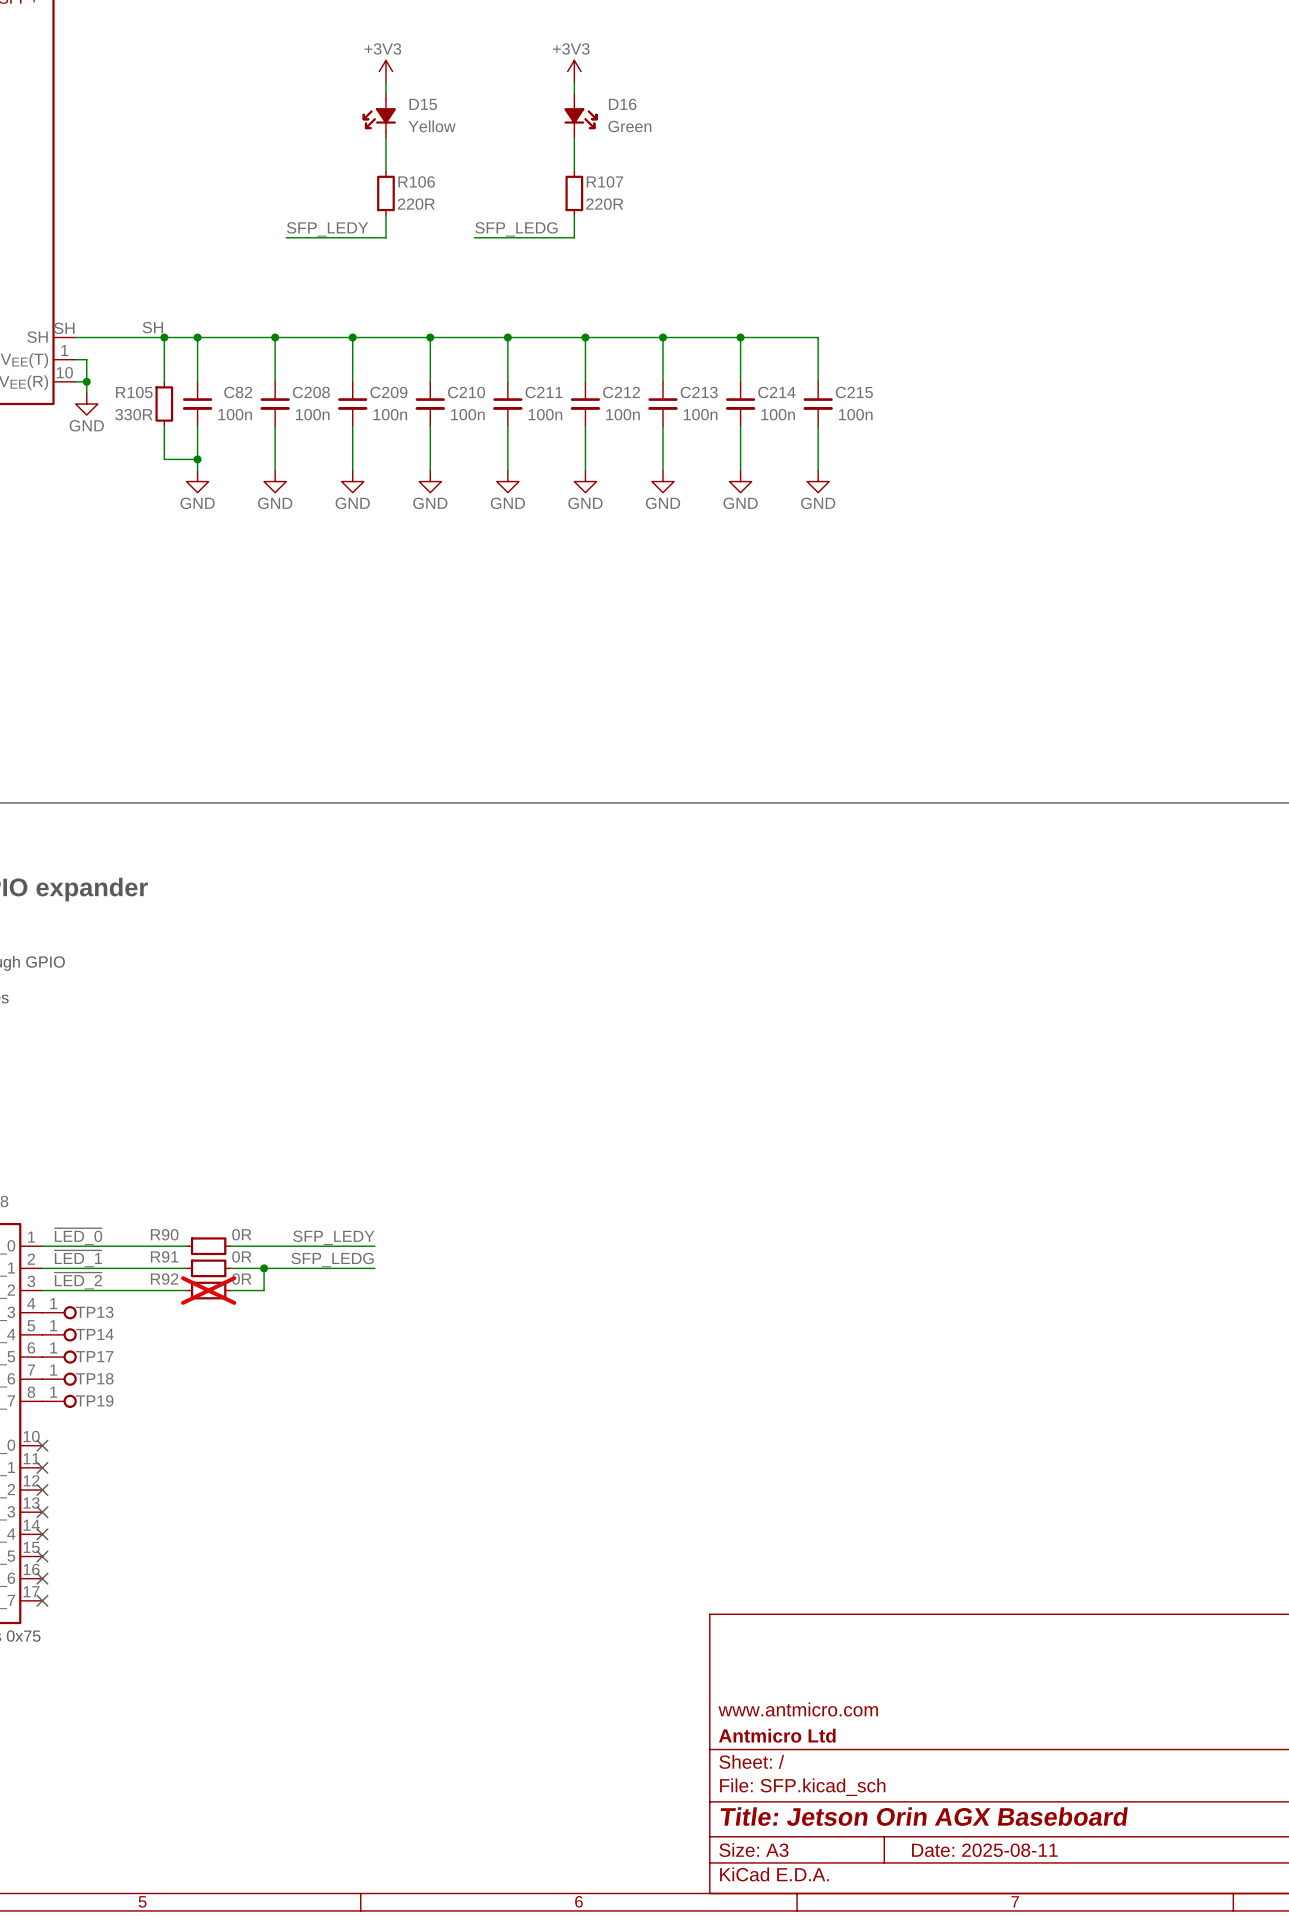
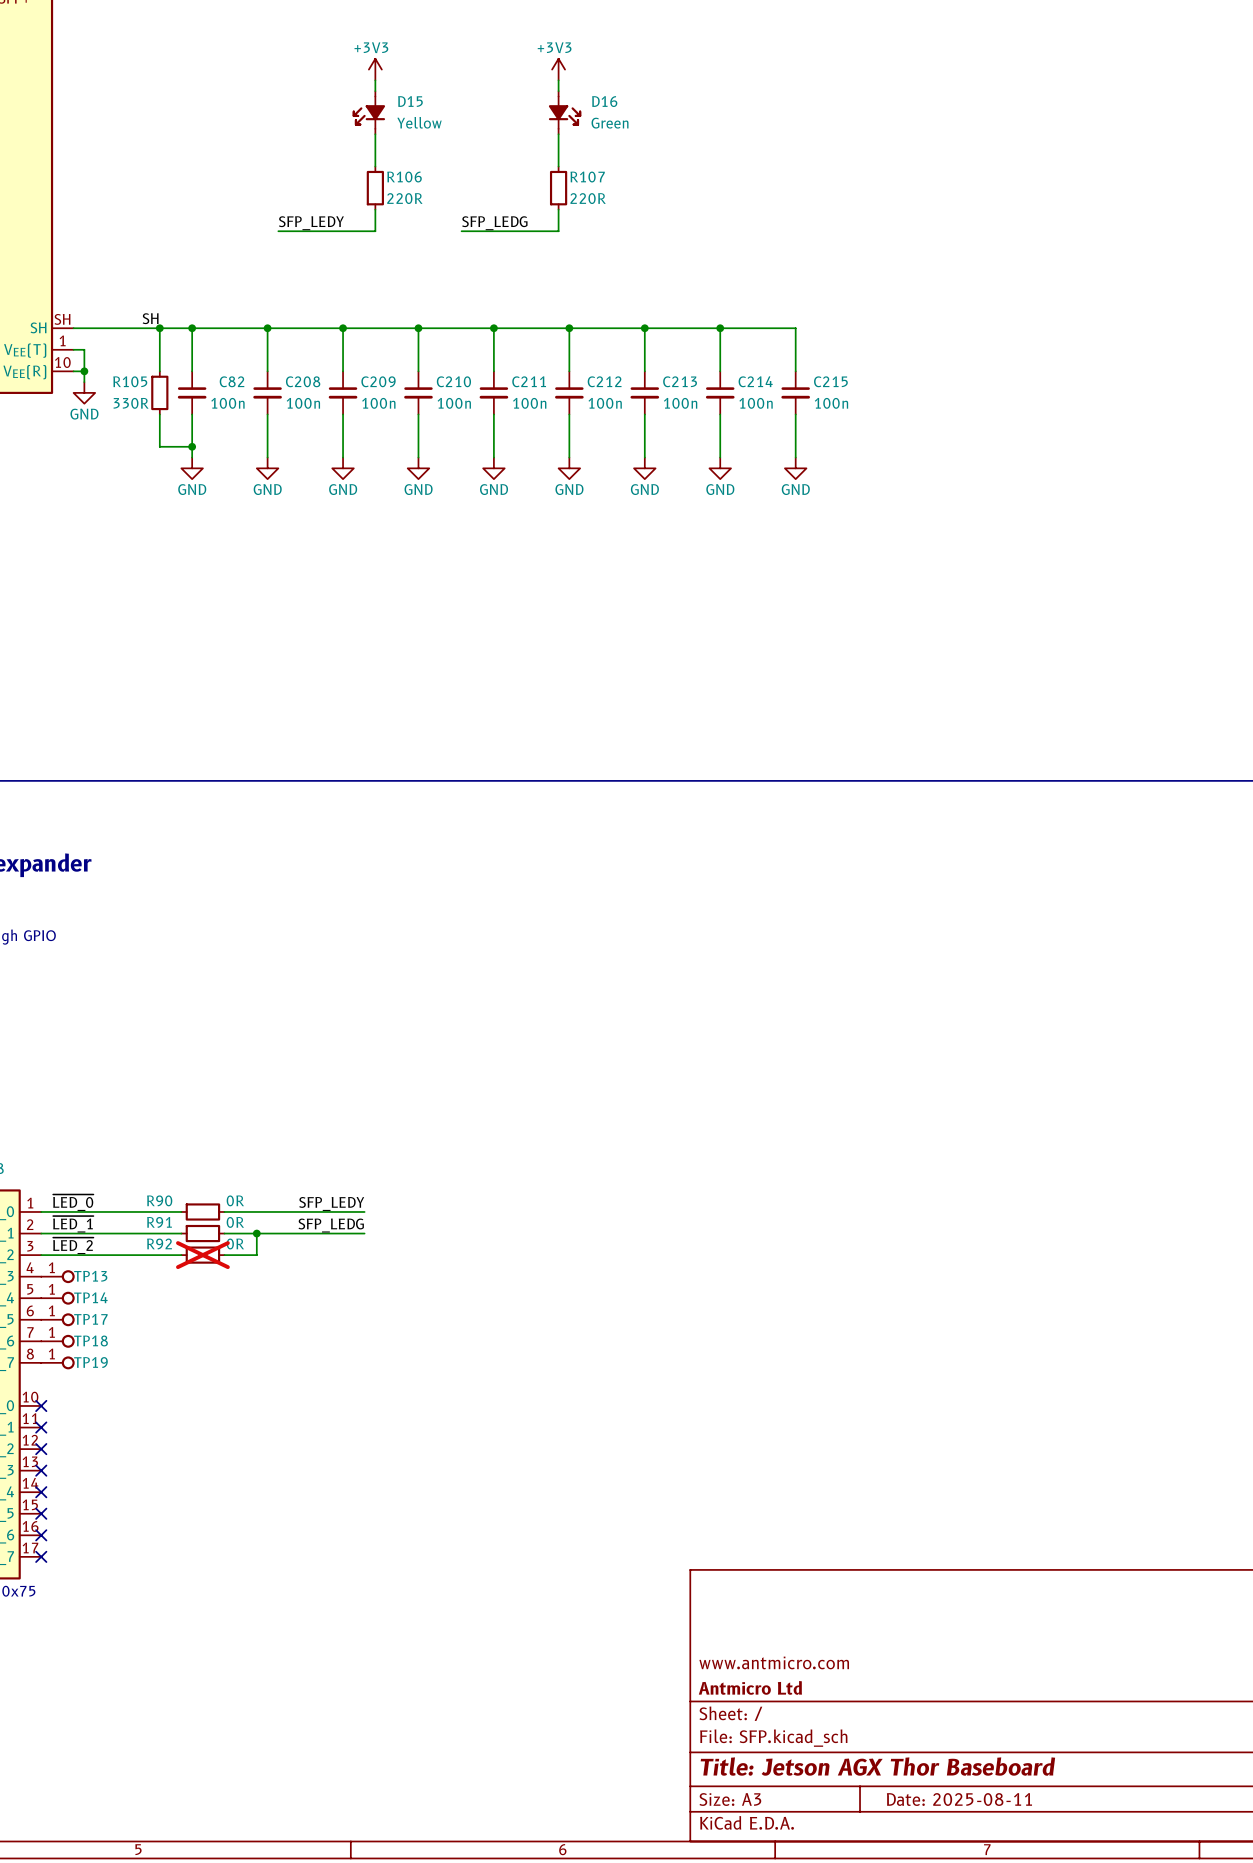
title block: Title: Jetson Orin AGX Baseboard (924, 1816) -> Title: Jetson AGX Thor Baseboard (877, 1766)

